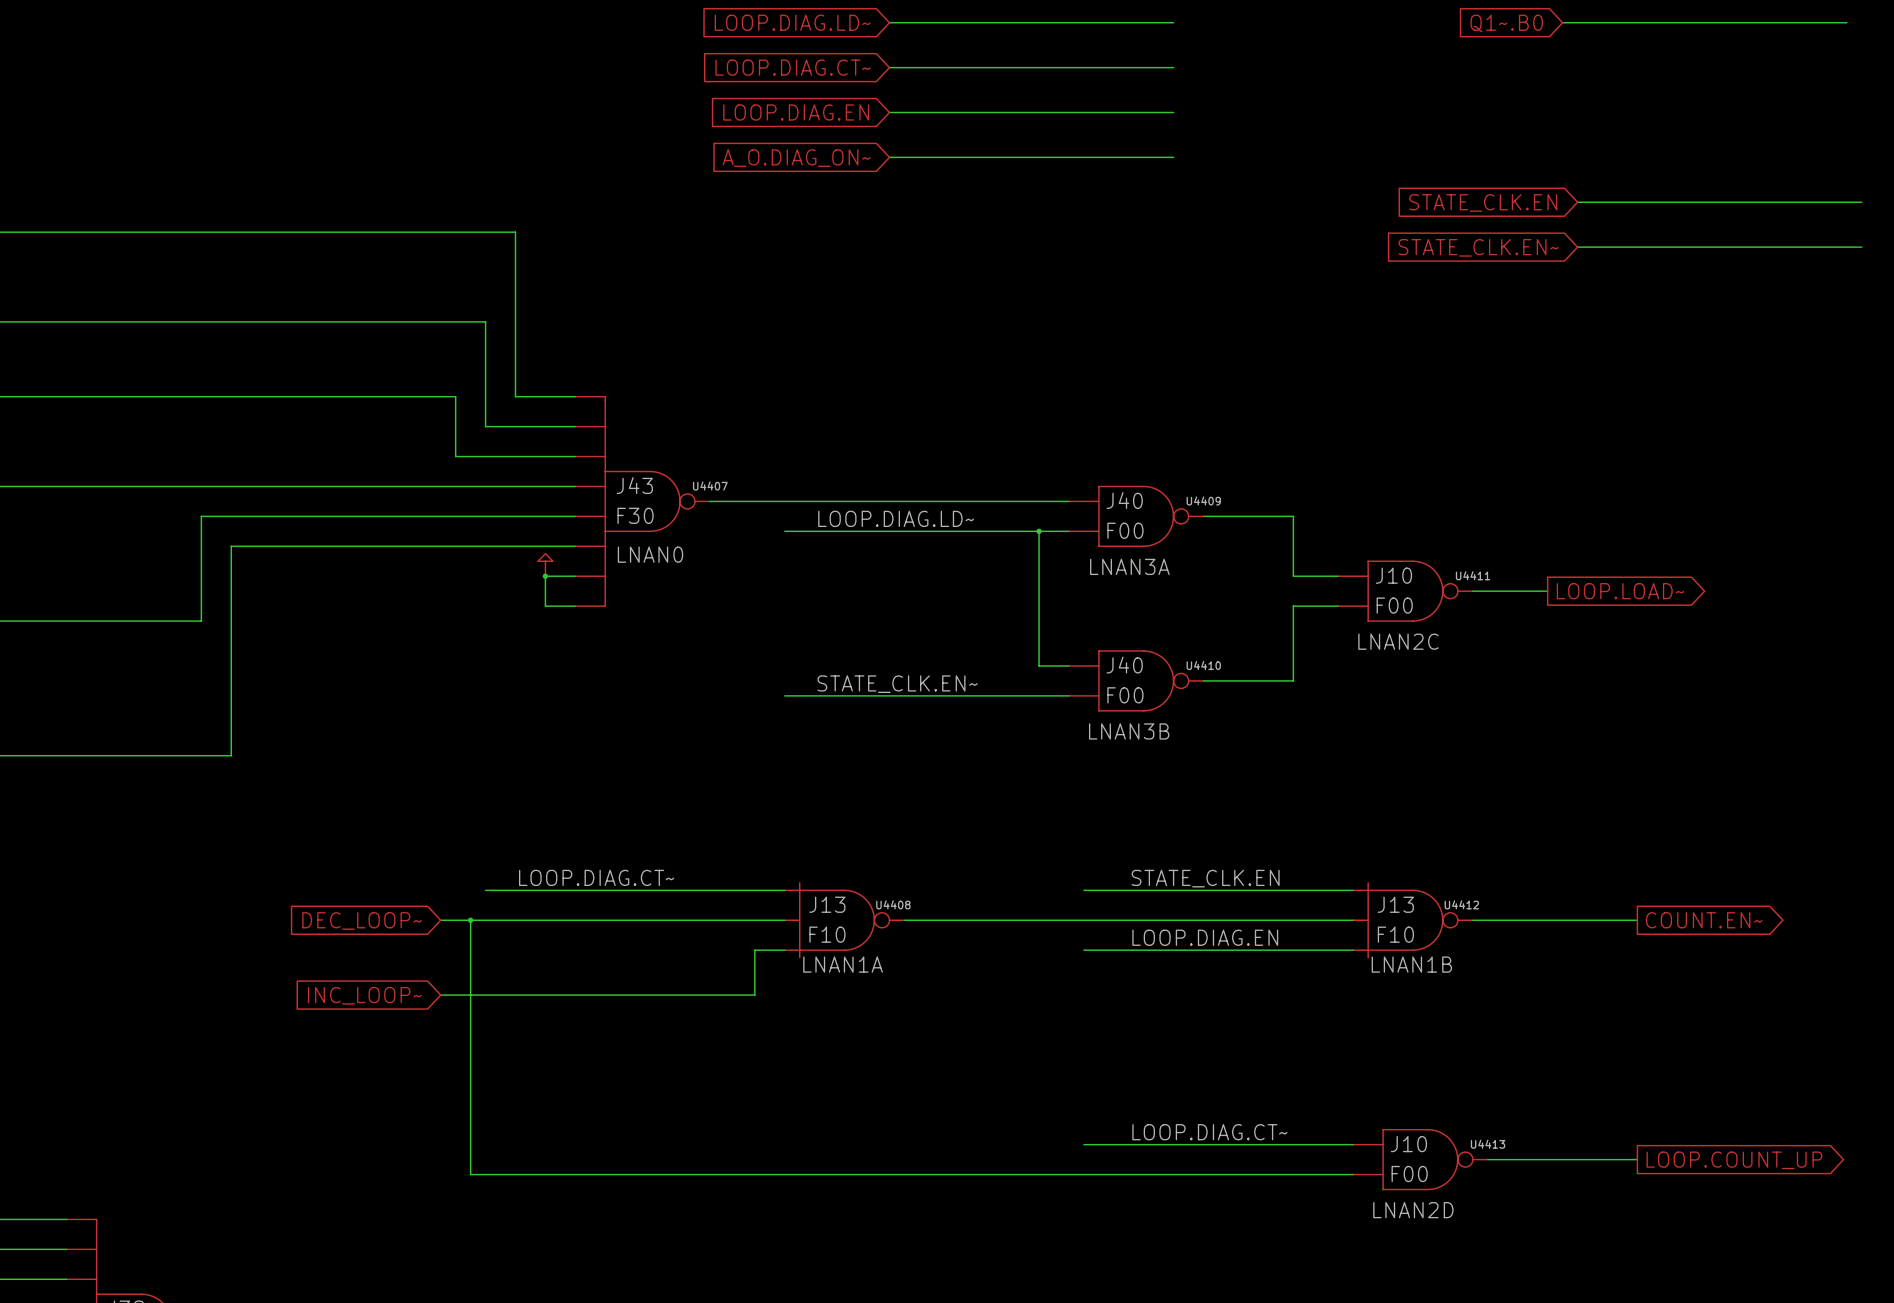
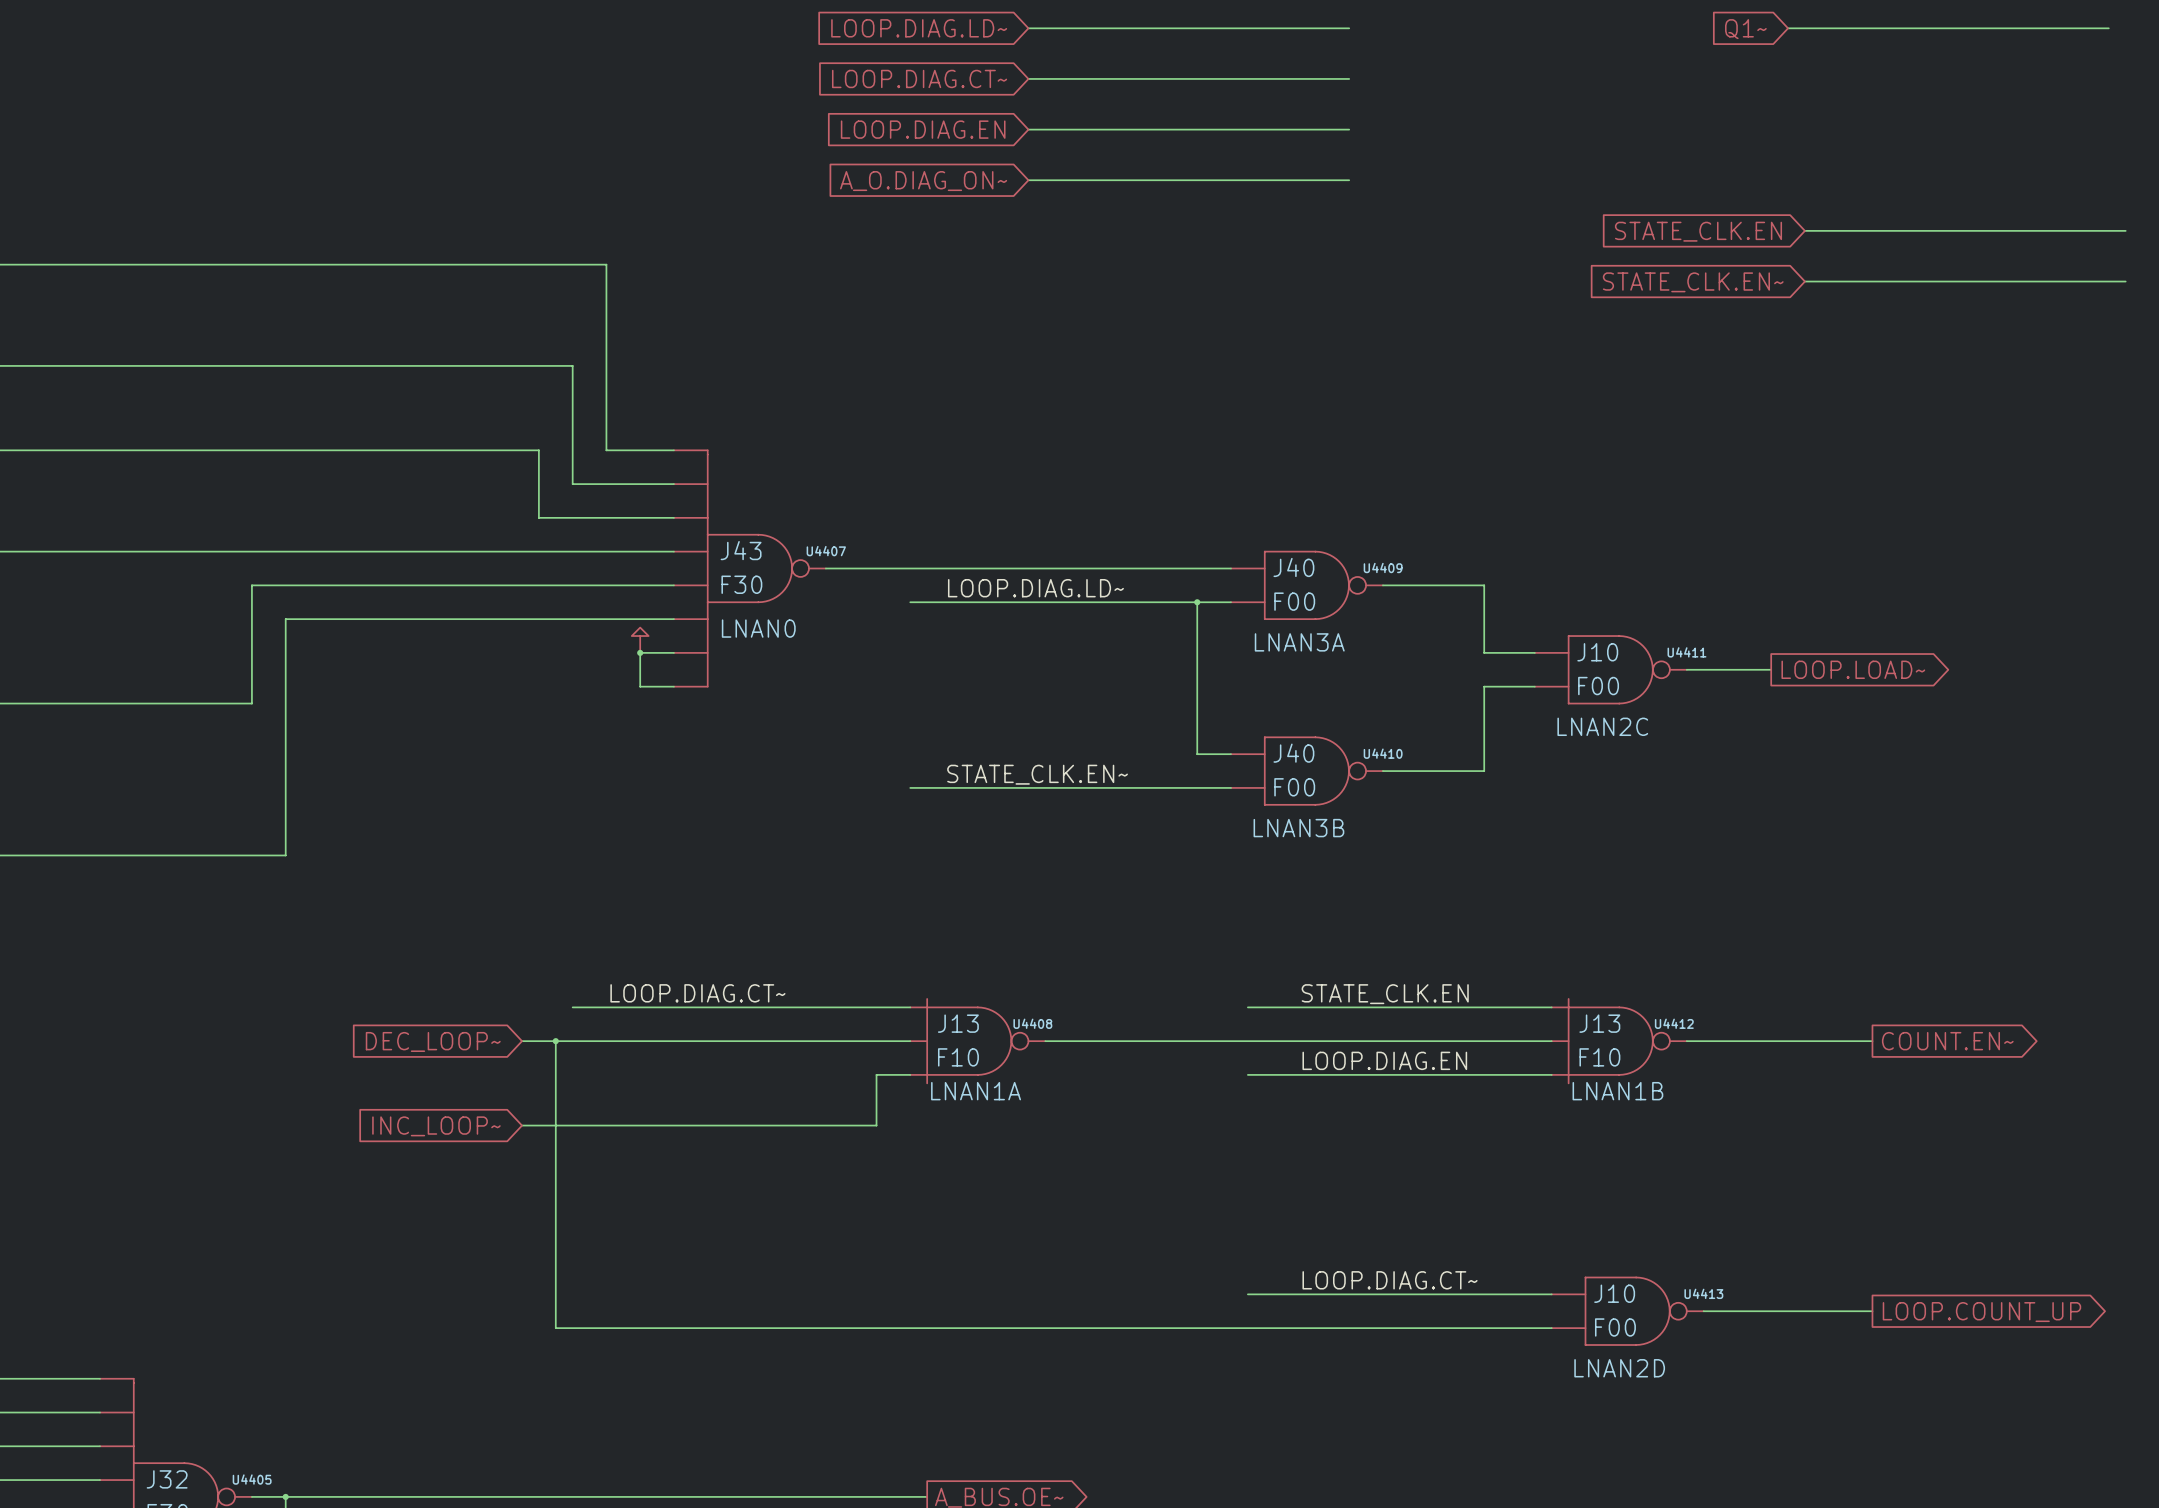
global label: Q1~.B0 (1506, 23) -> Q1~ (1745, 29)

